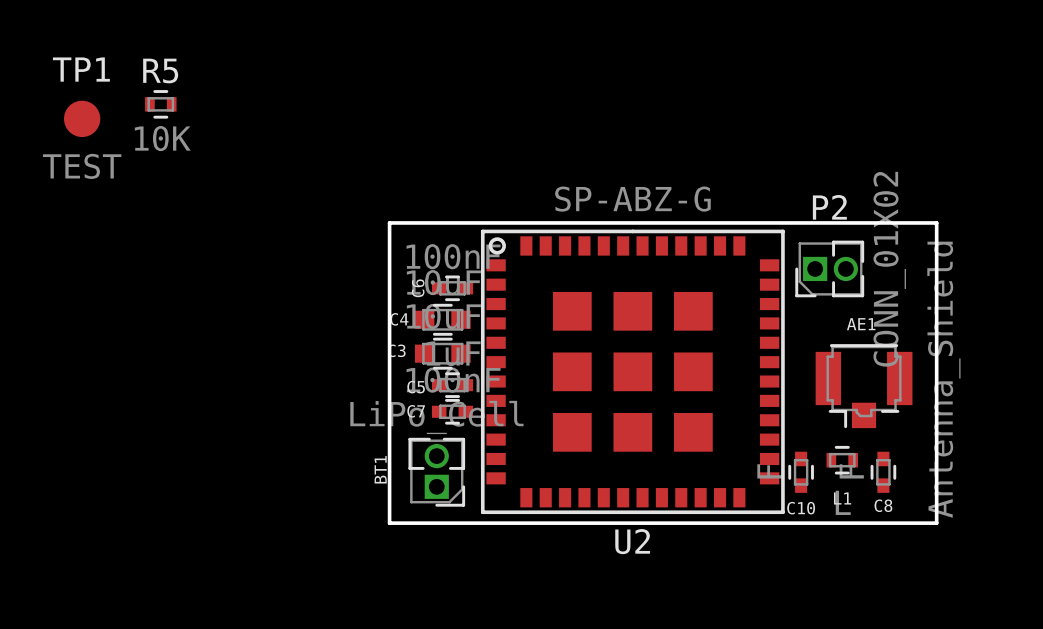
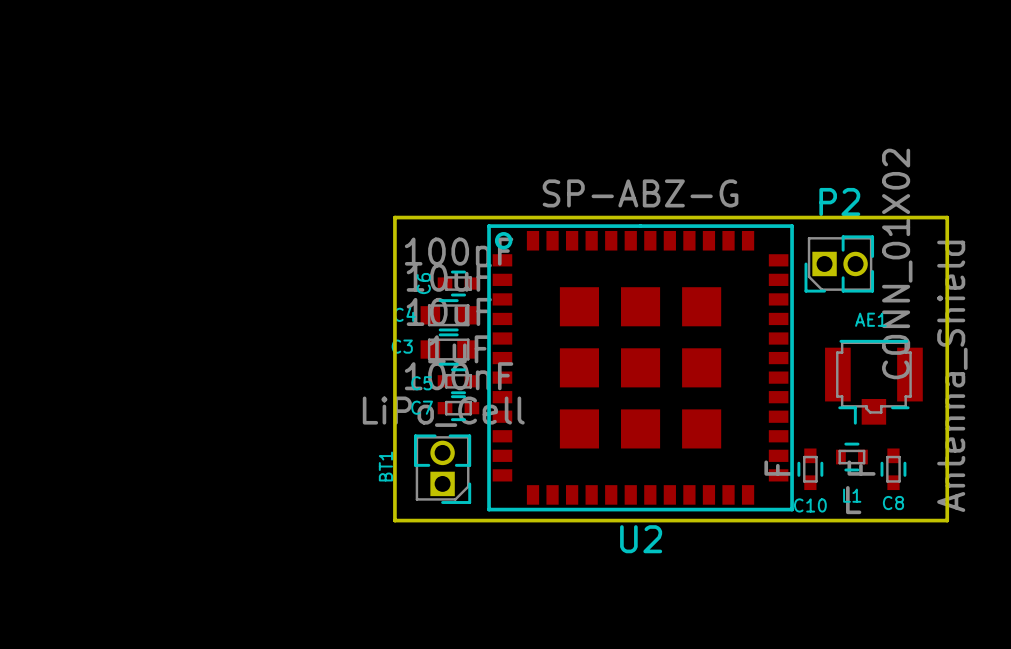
R5: 10K (160, 104) -> none
TP1: TEST (82, 118) -> none

